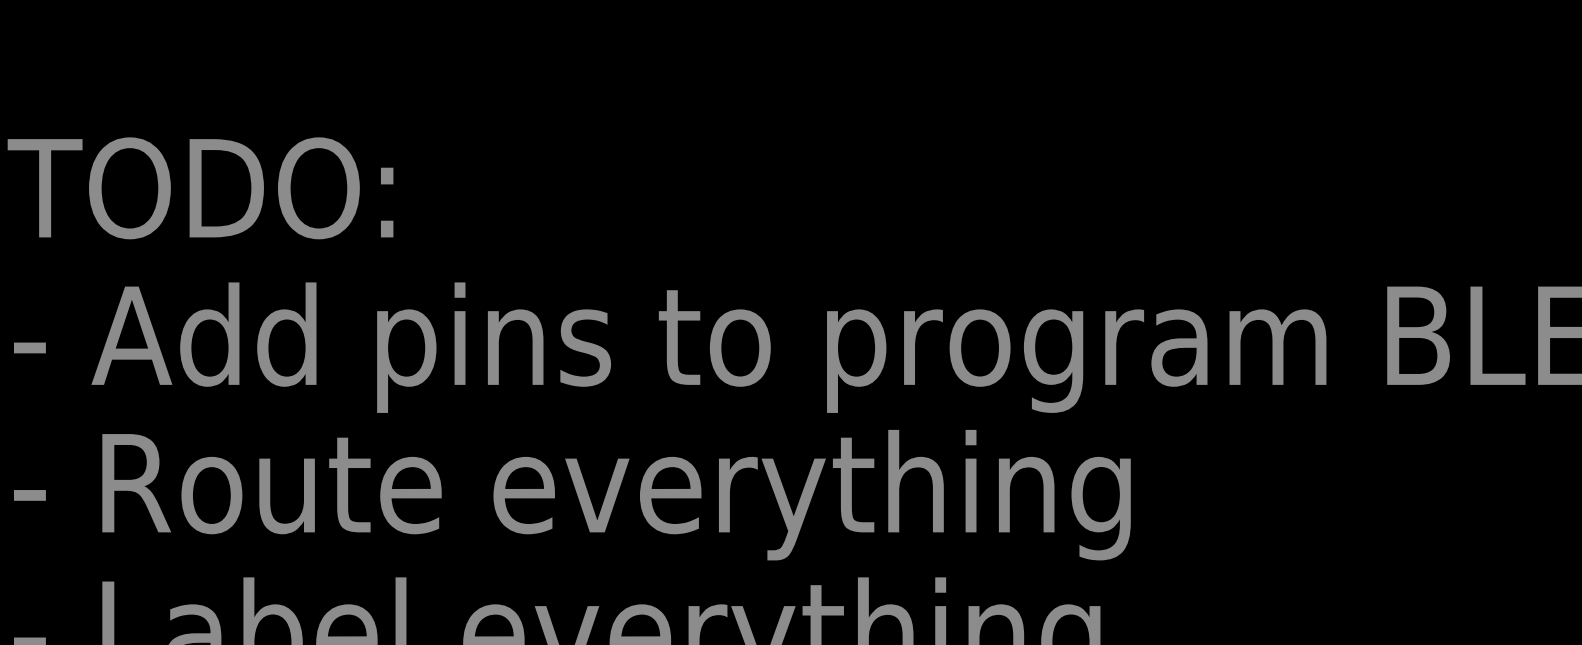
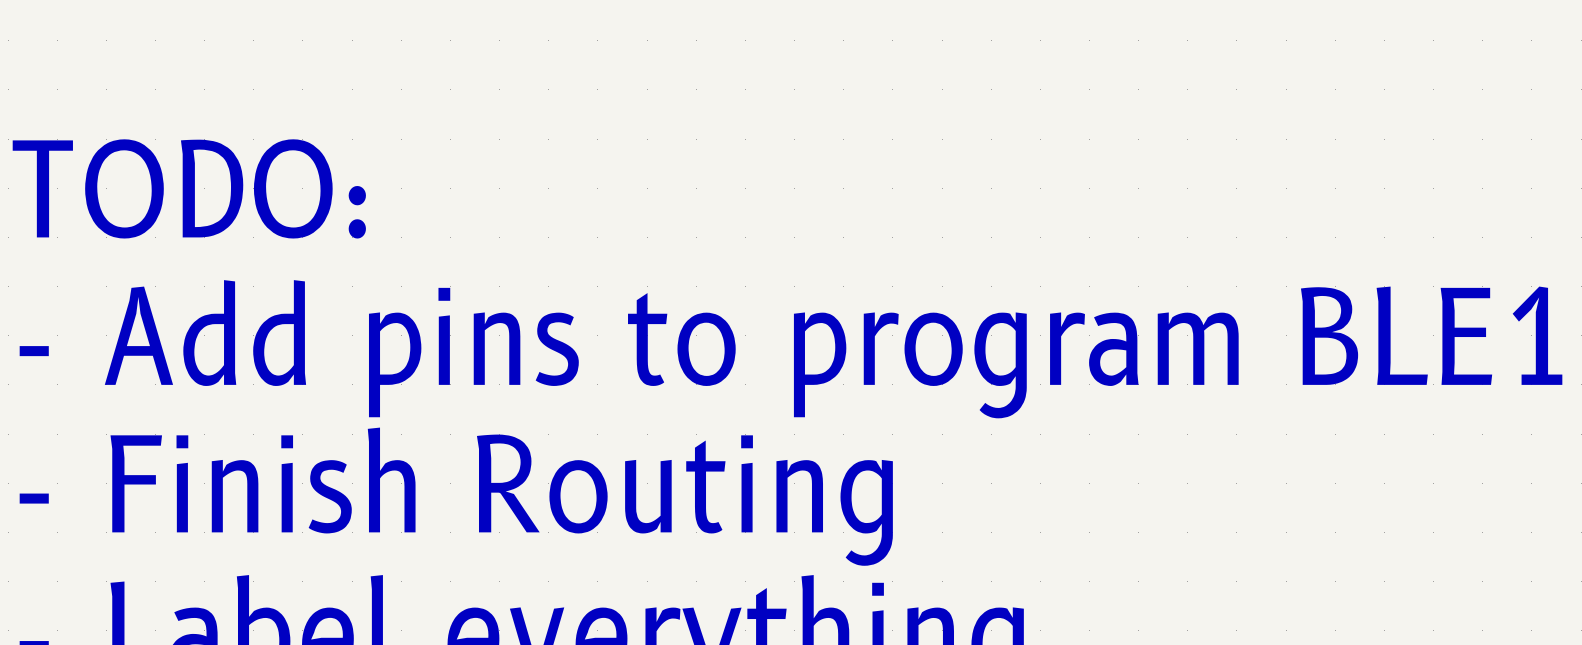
text: - Route everything (572, 495) -> - Finish Routing (456, 496)

